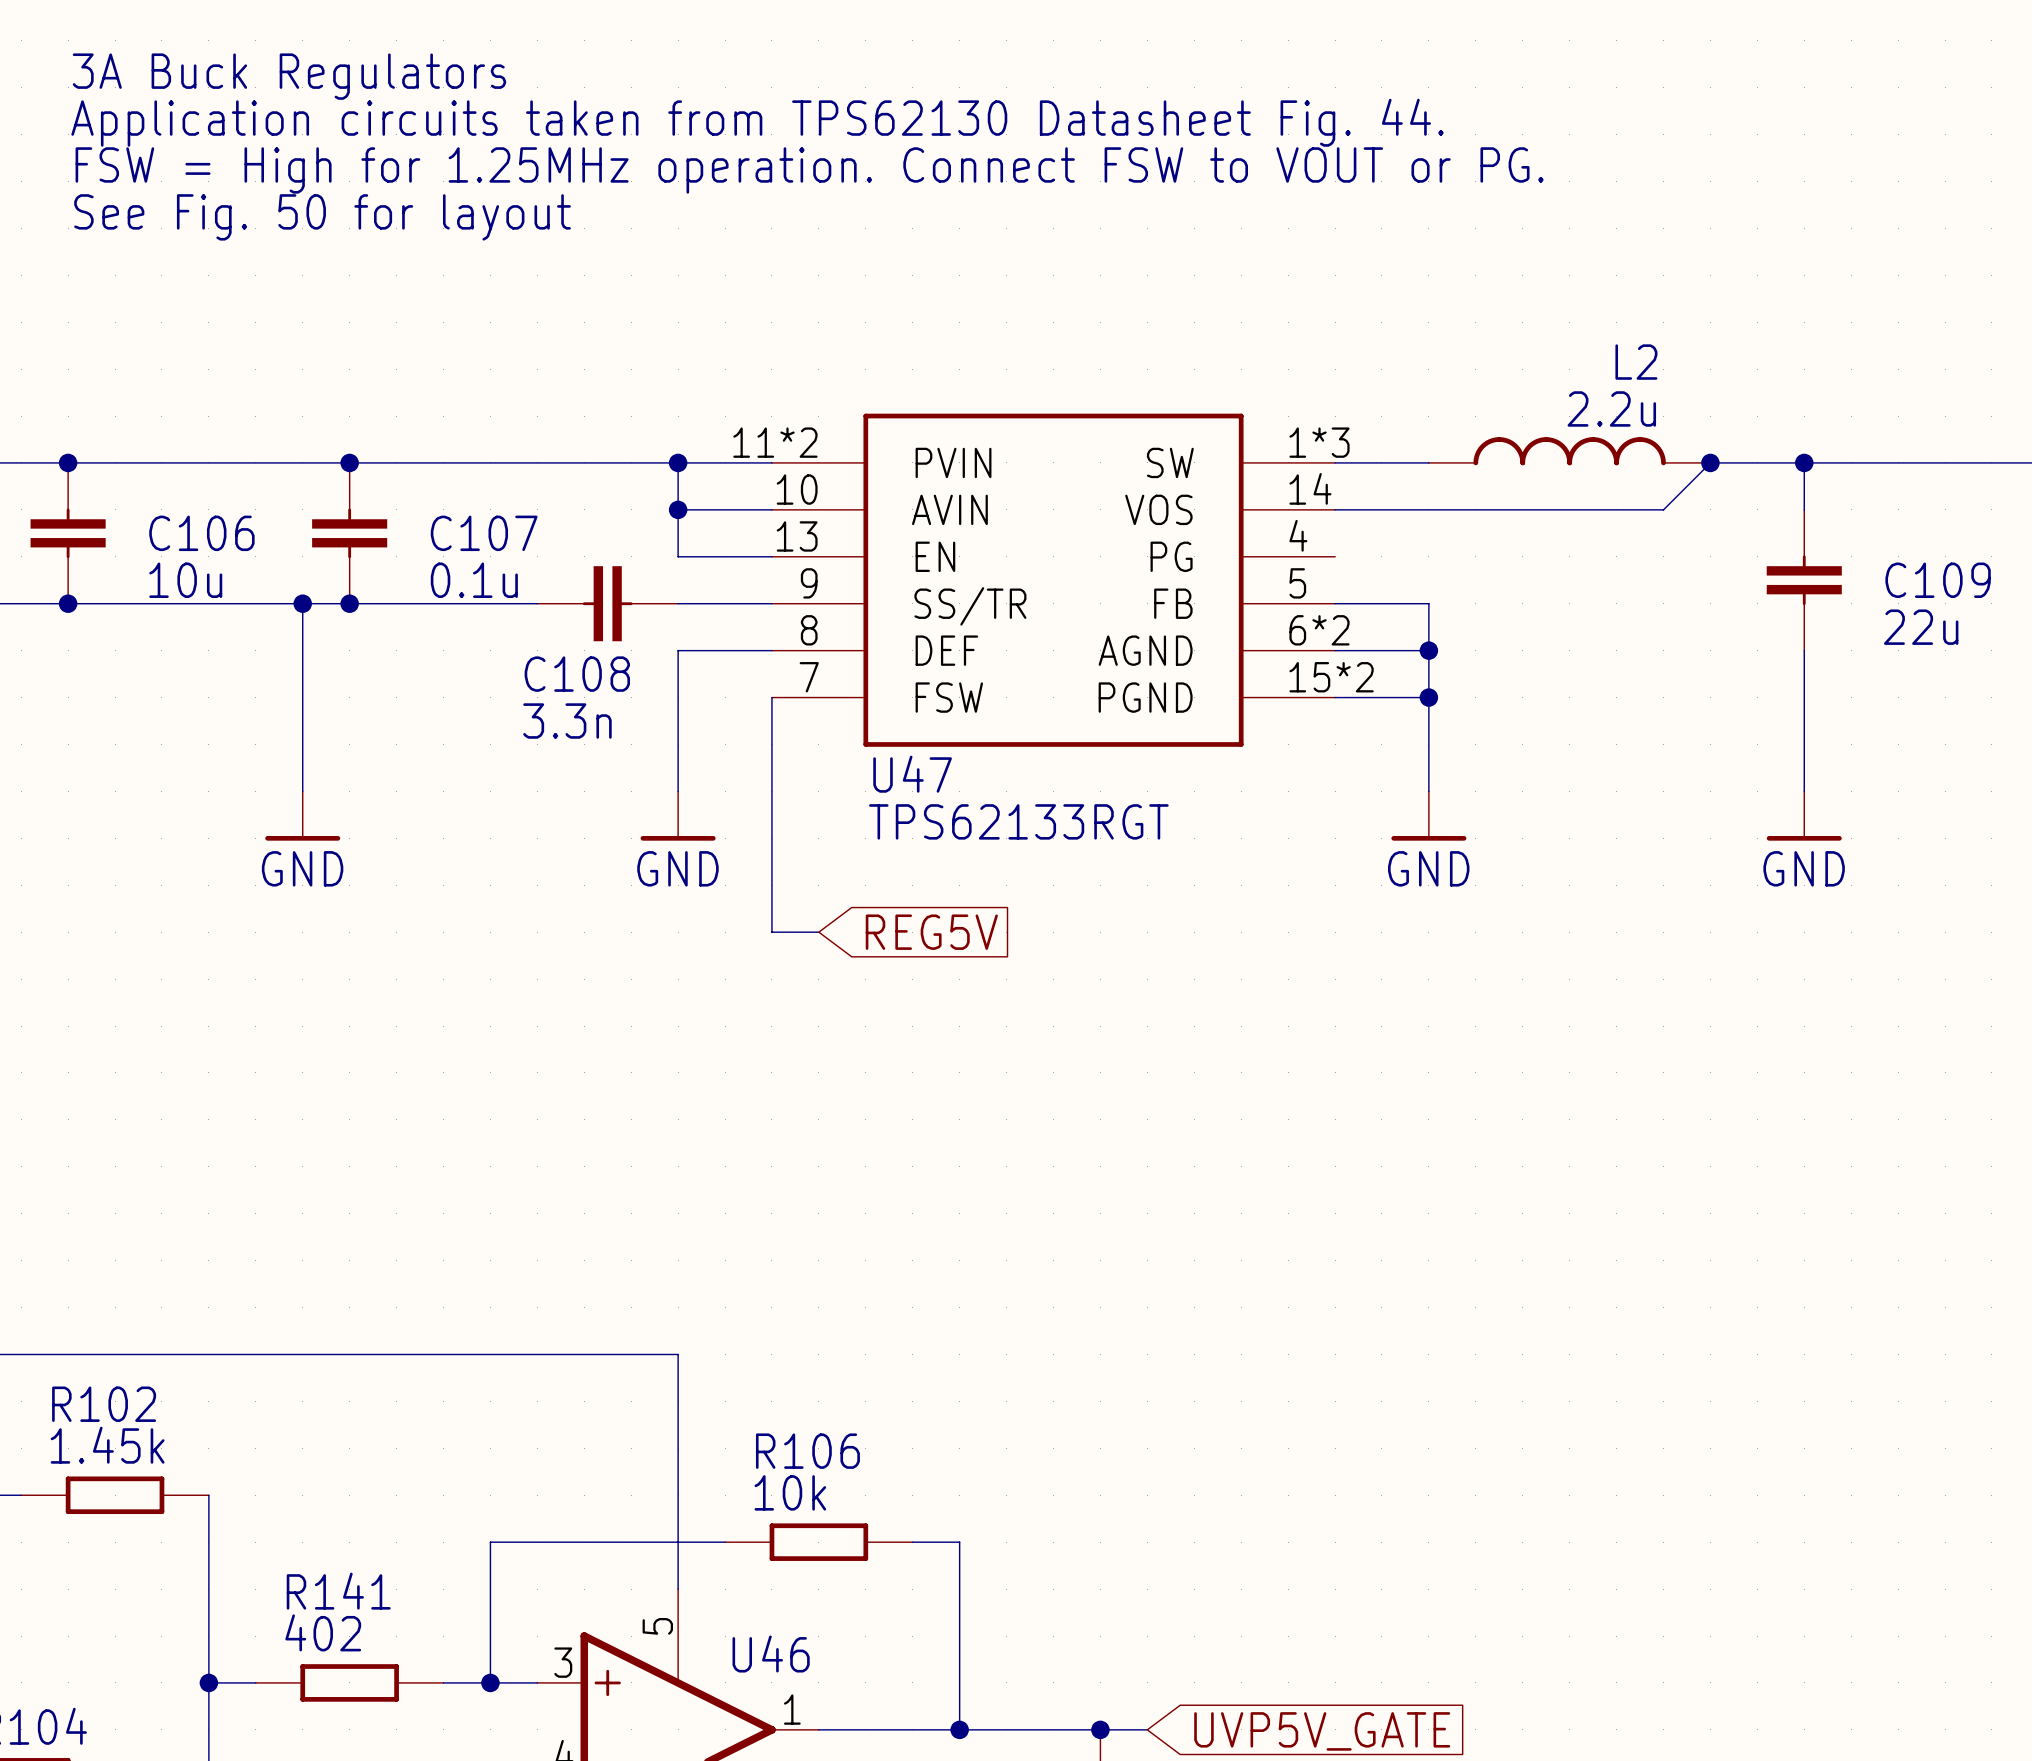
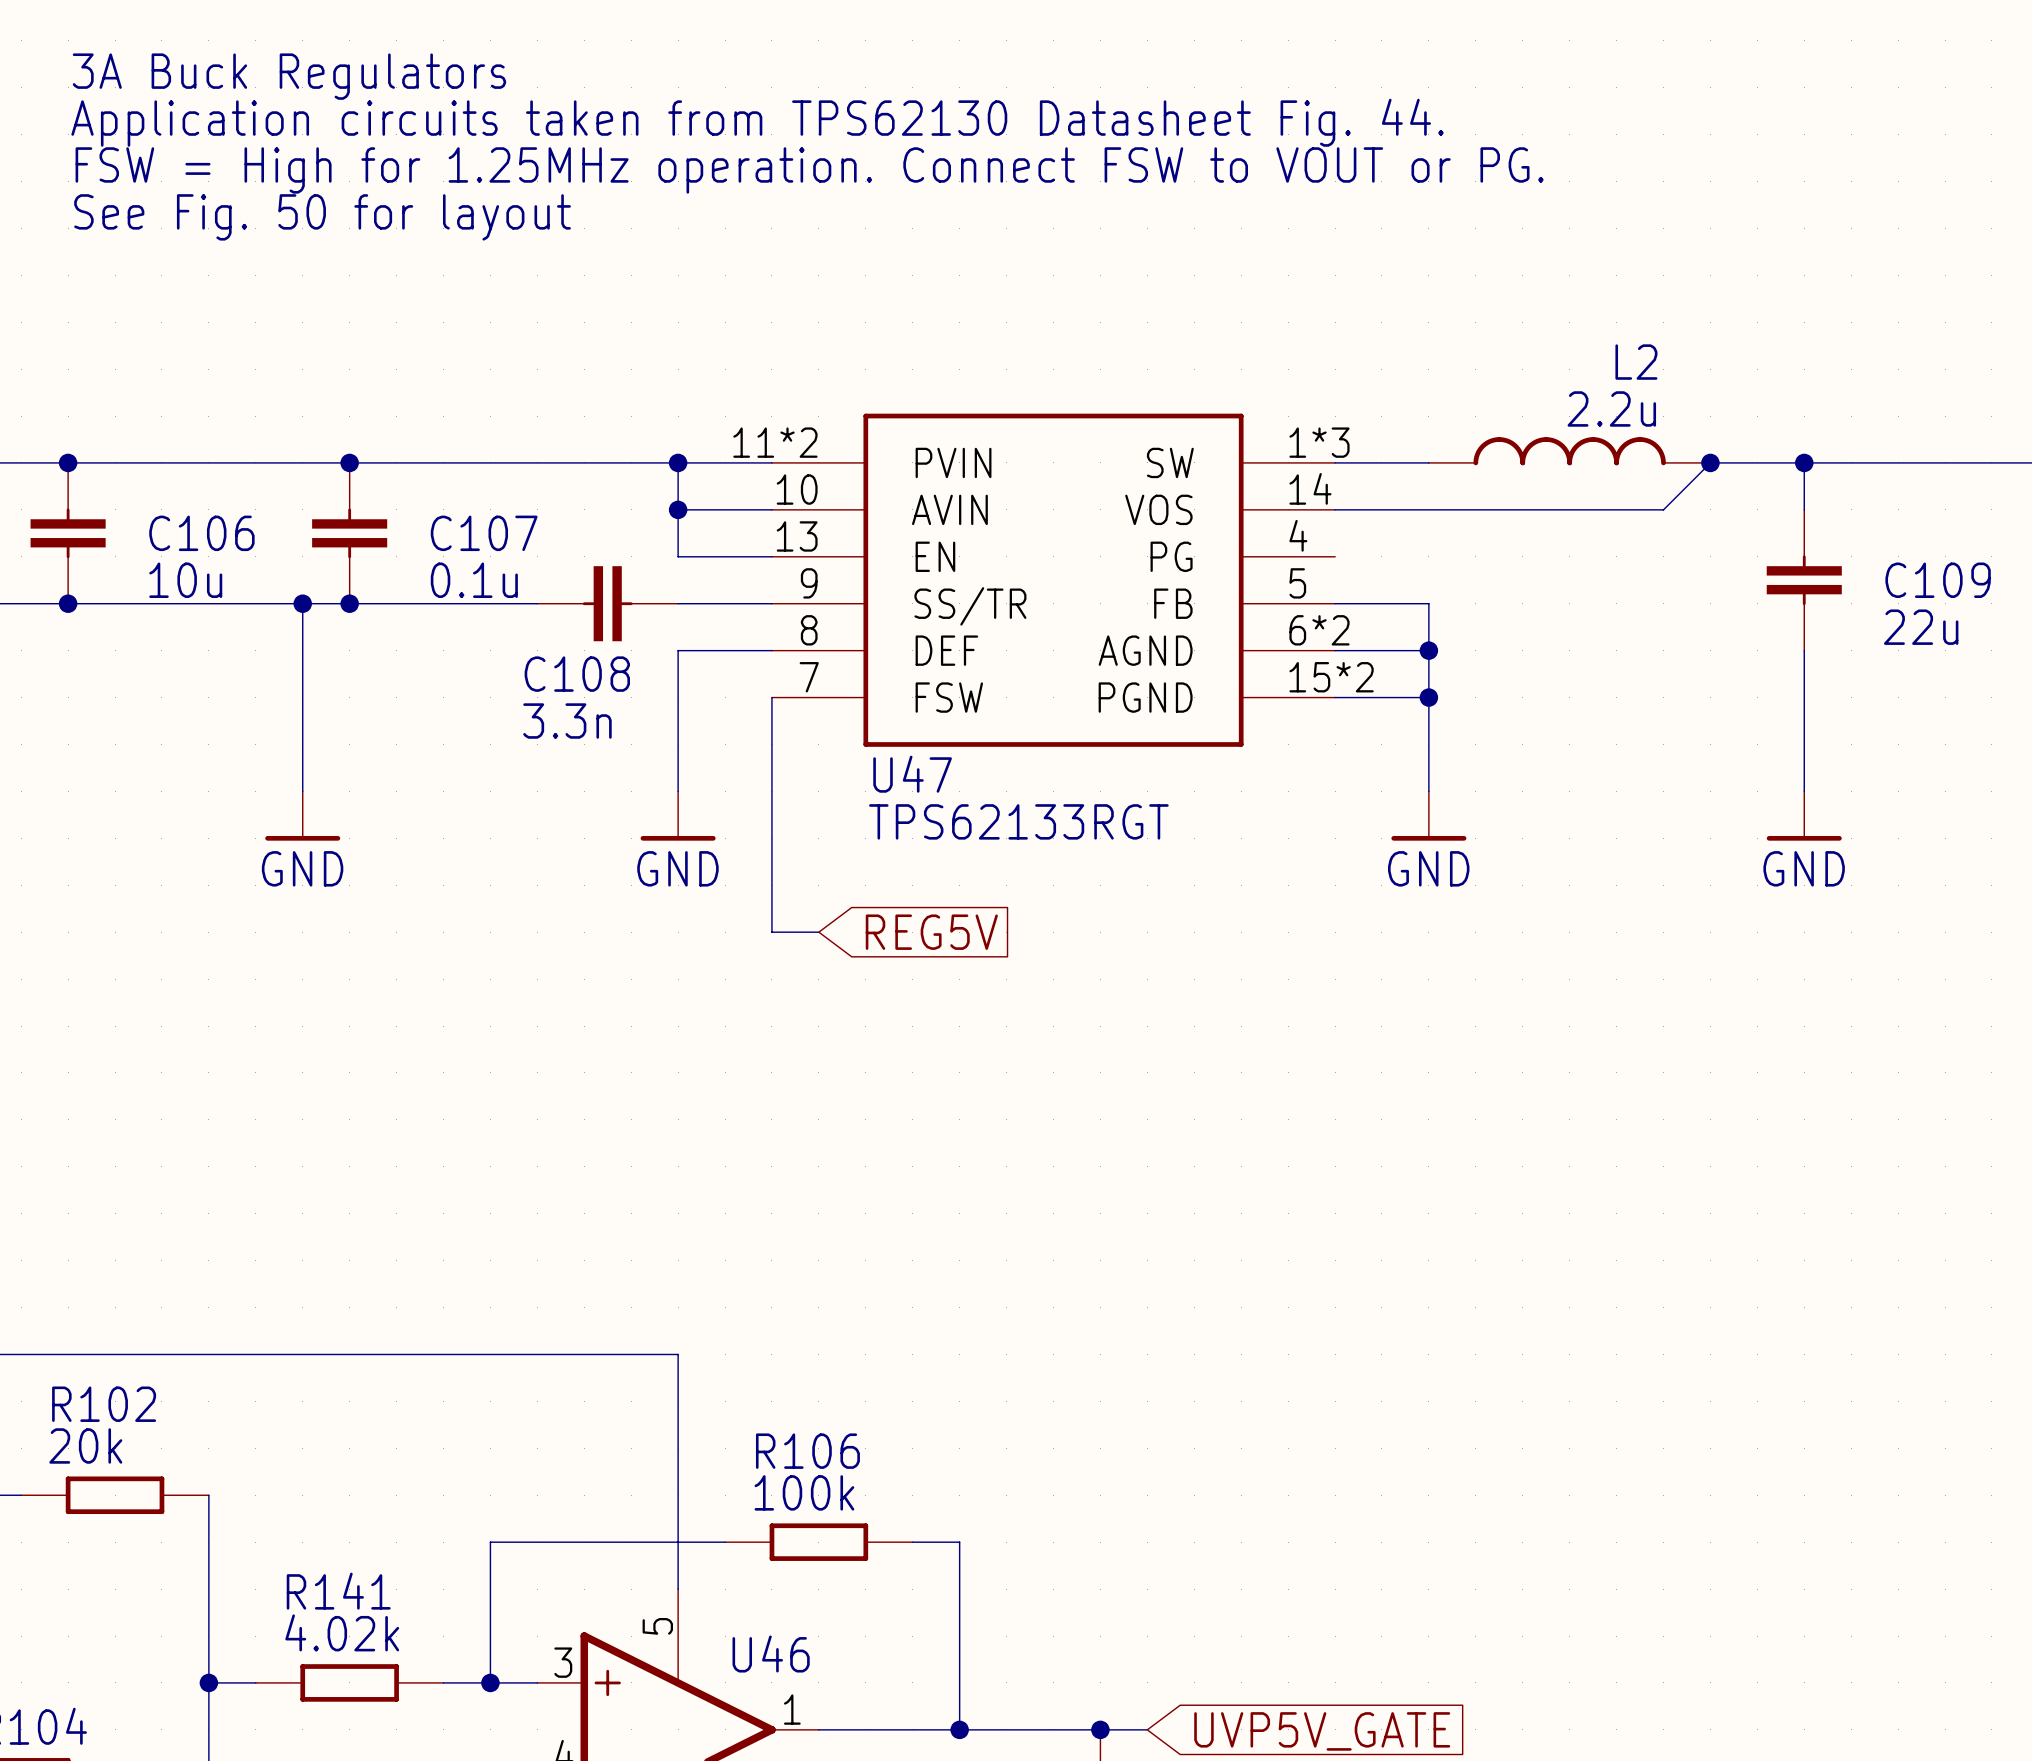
R102 value: 1.45k (107, 1445) -> 20k (85, 1445)
R106 value: 10k (790, 1492) -> 100k (804, 1492)
R141 value: 402 (323, 1632) -> 4.02k (342, 1632)

